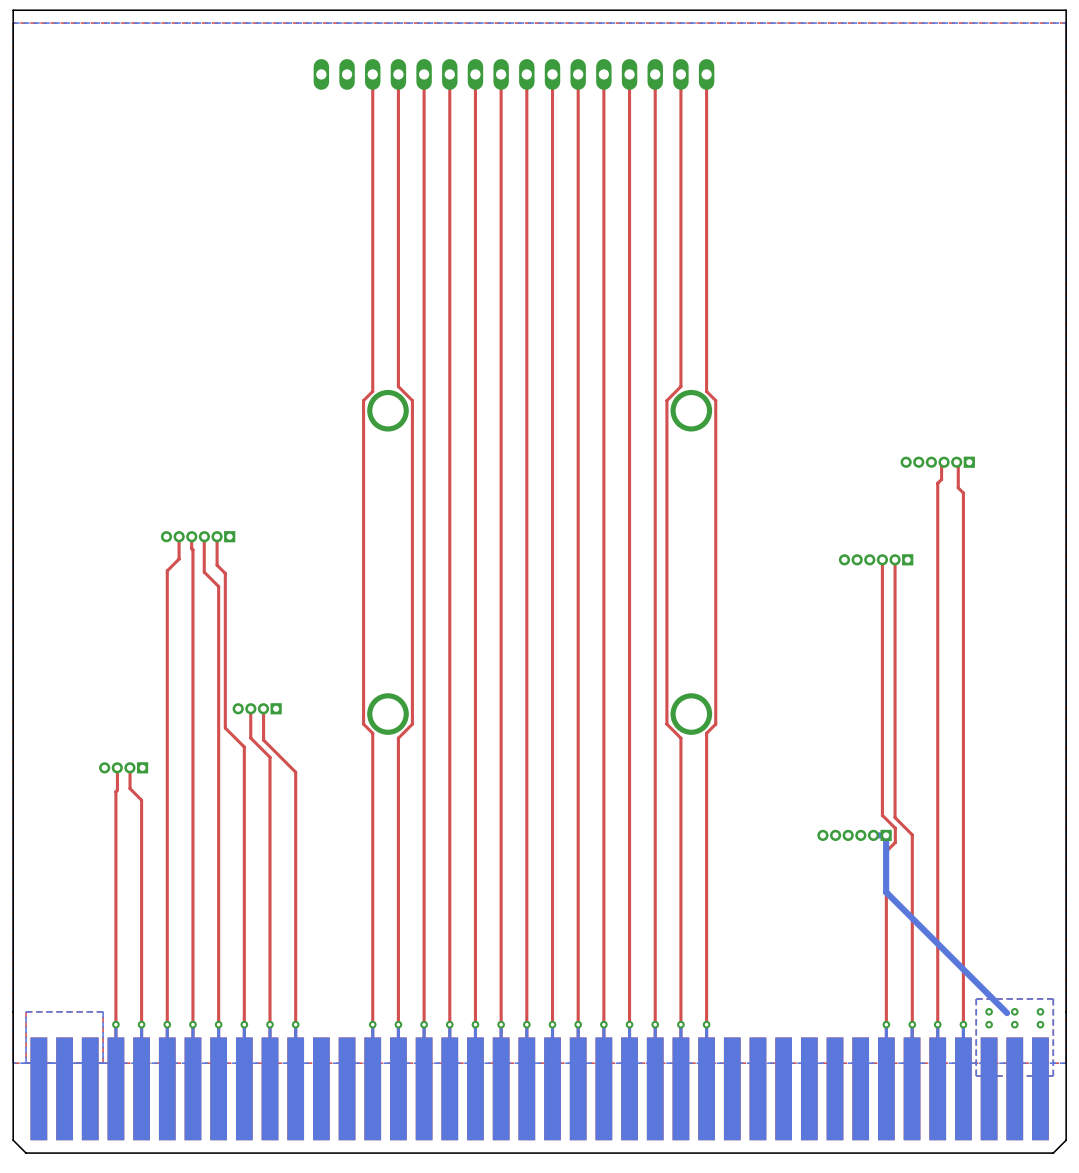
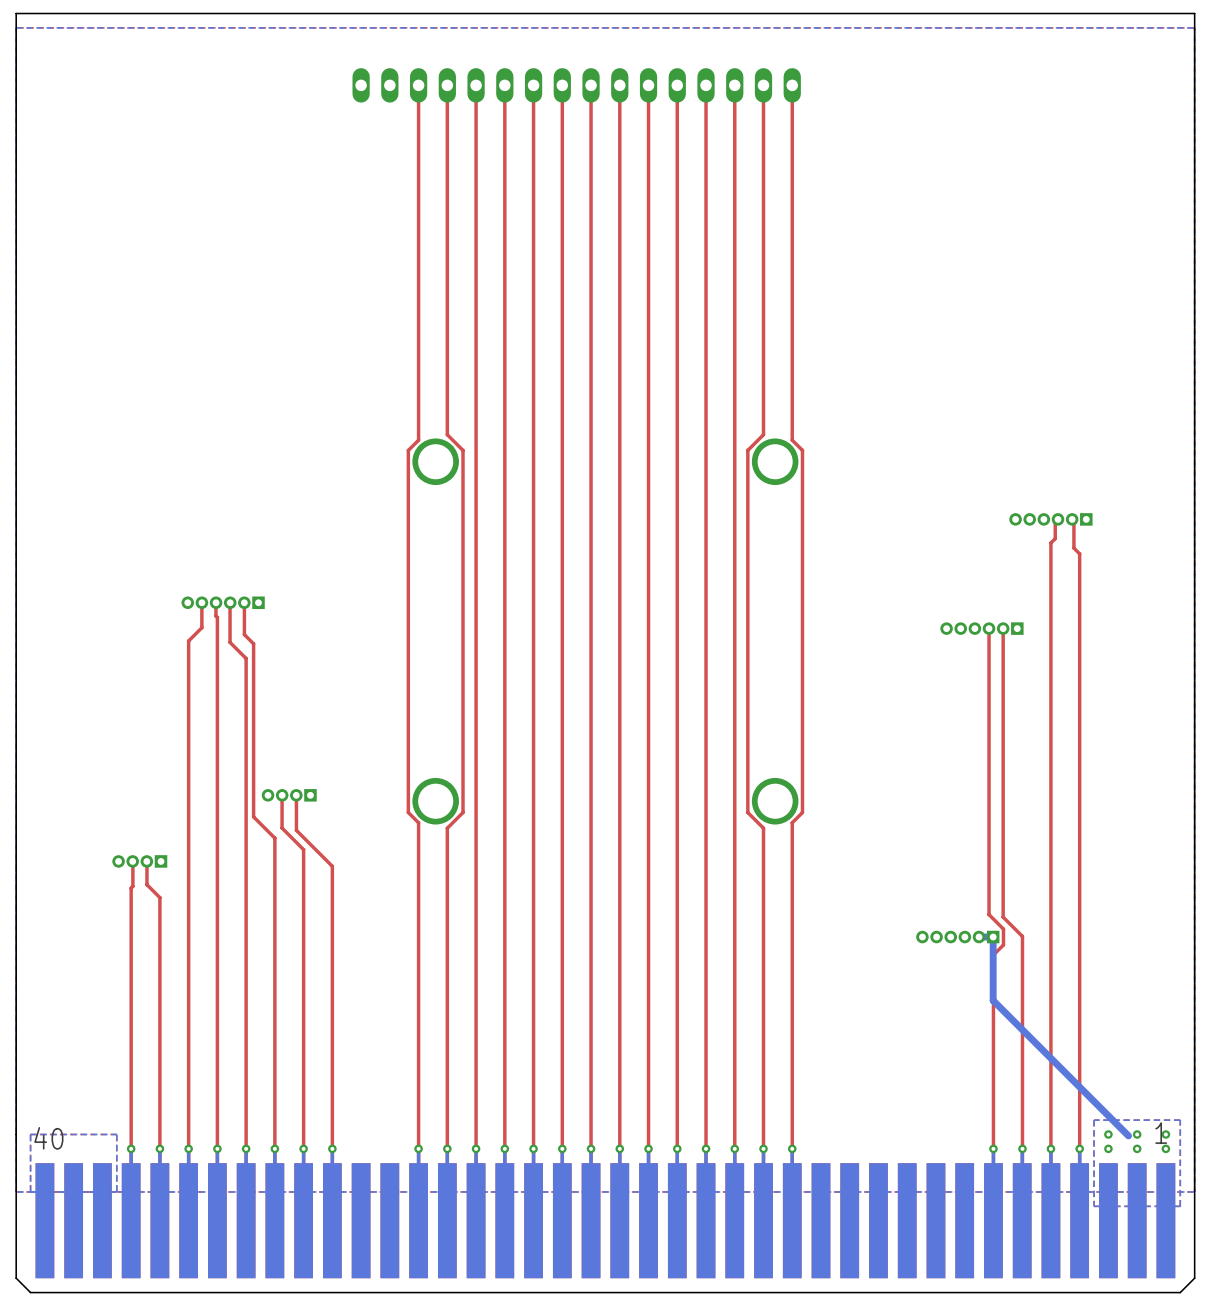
text: none -> 1 (1161, 1133)
text: none -> 40 (48, 1138)

